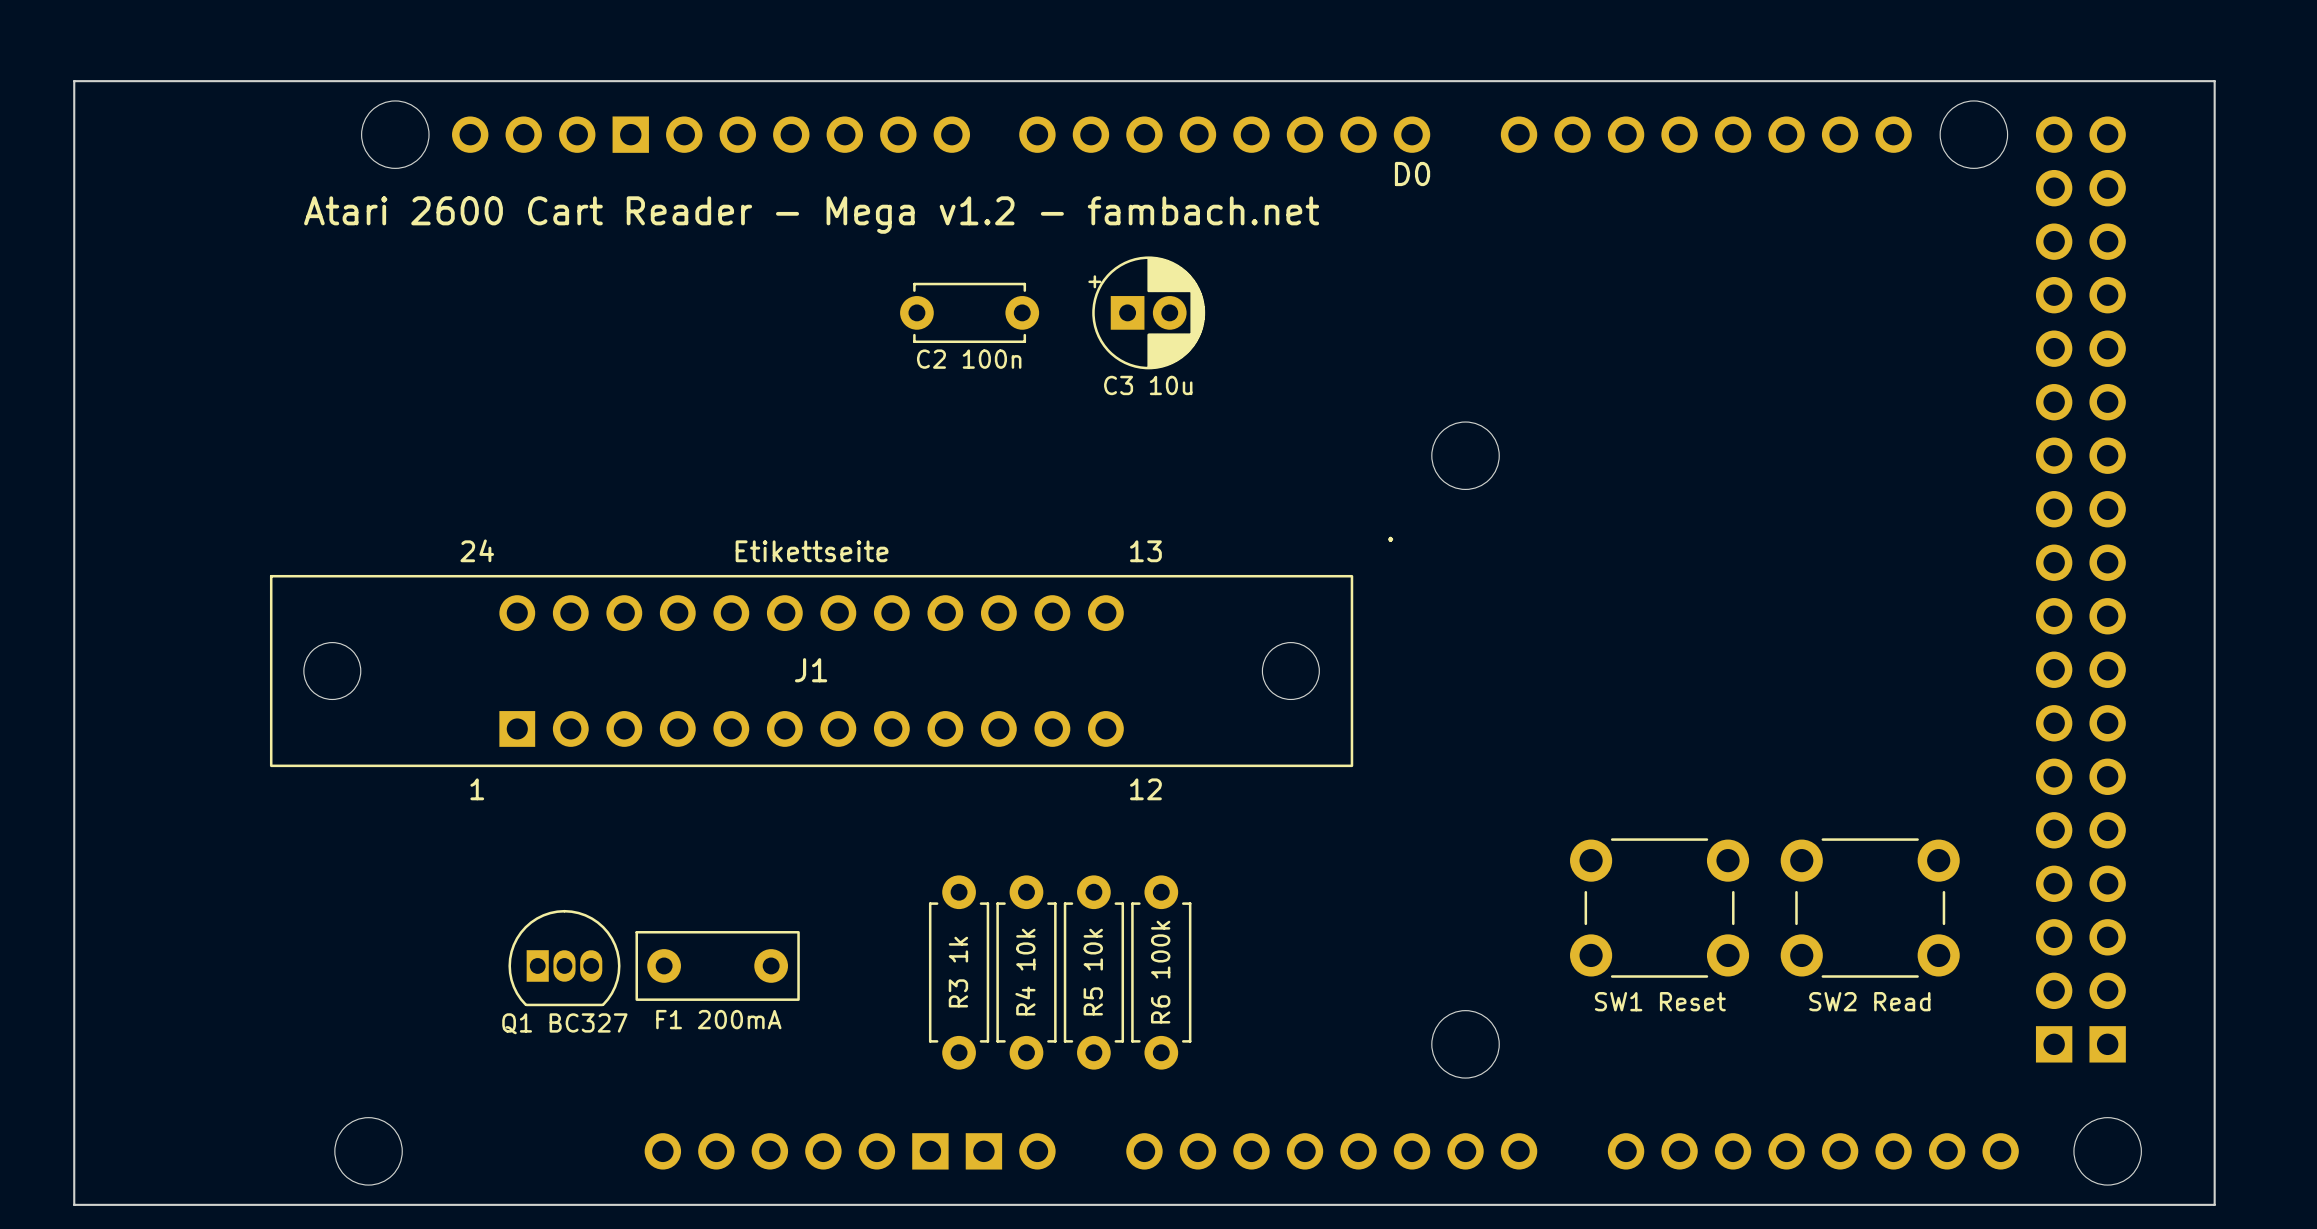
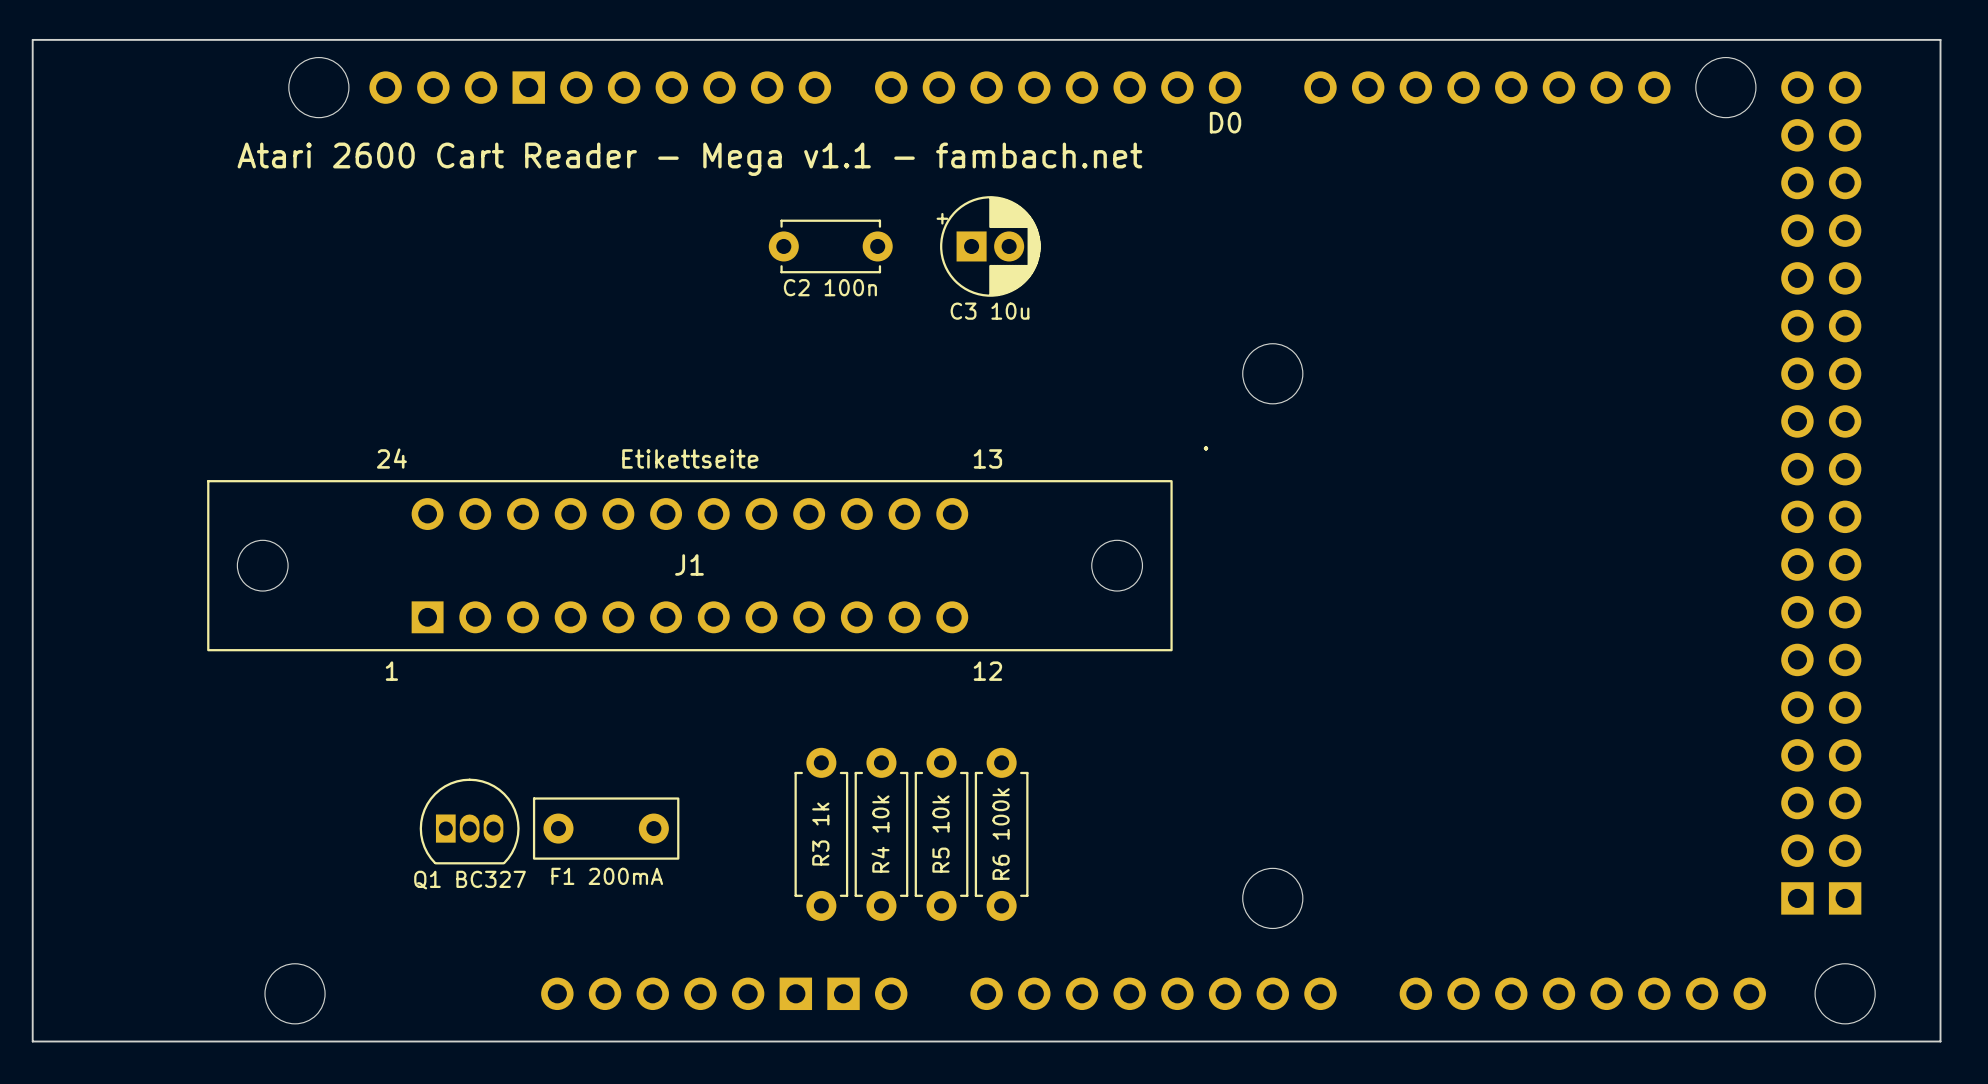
text: Atari 2600 Cart Reader - Mega v1.2 - fambach.net (811, 215) -> Atari 2600 Cart Reader - Mega v1.1 - fambach.net (689, 159)
part: (1659, 908) -> none
part: (1870, 908) -> none
text: SW1 Reset (1660, 1001) -> none
text: SW2 Read (1869, 1001) -> none

